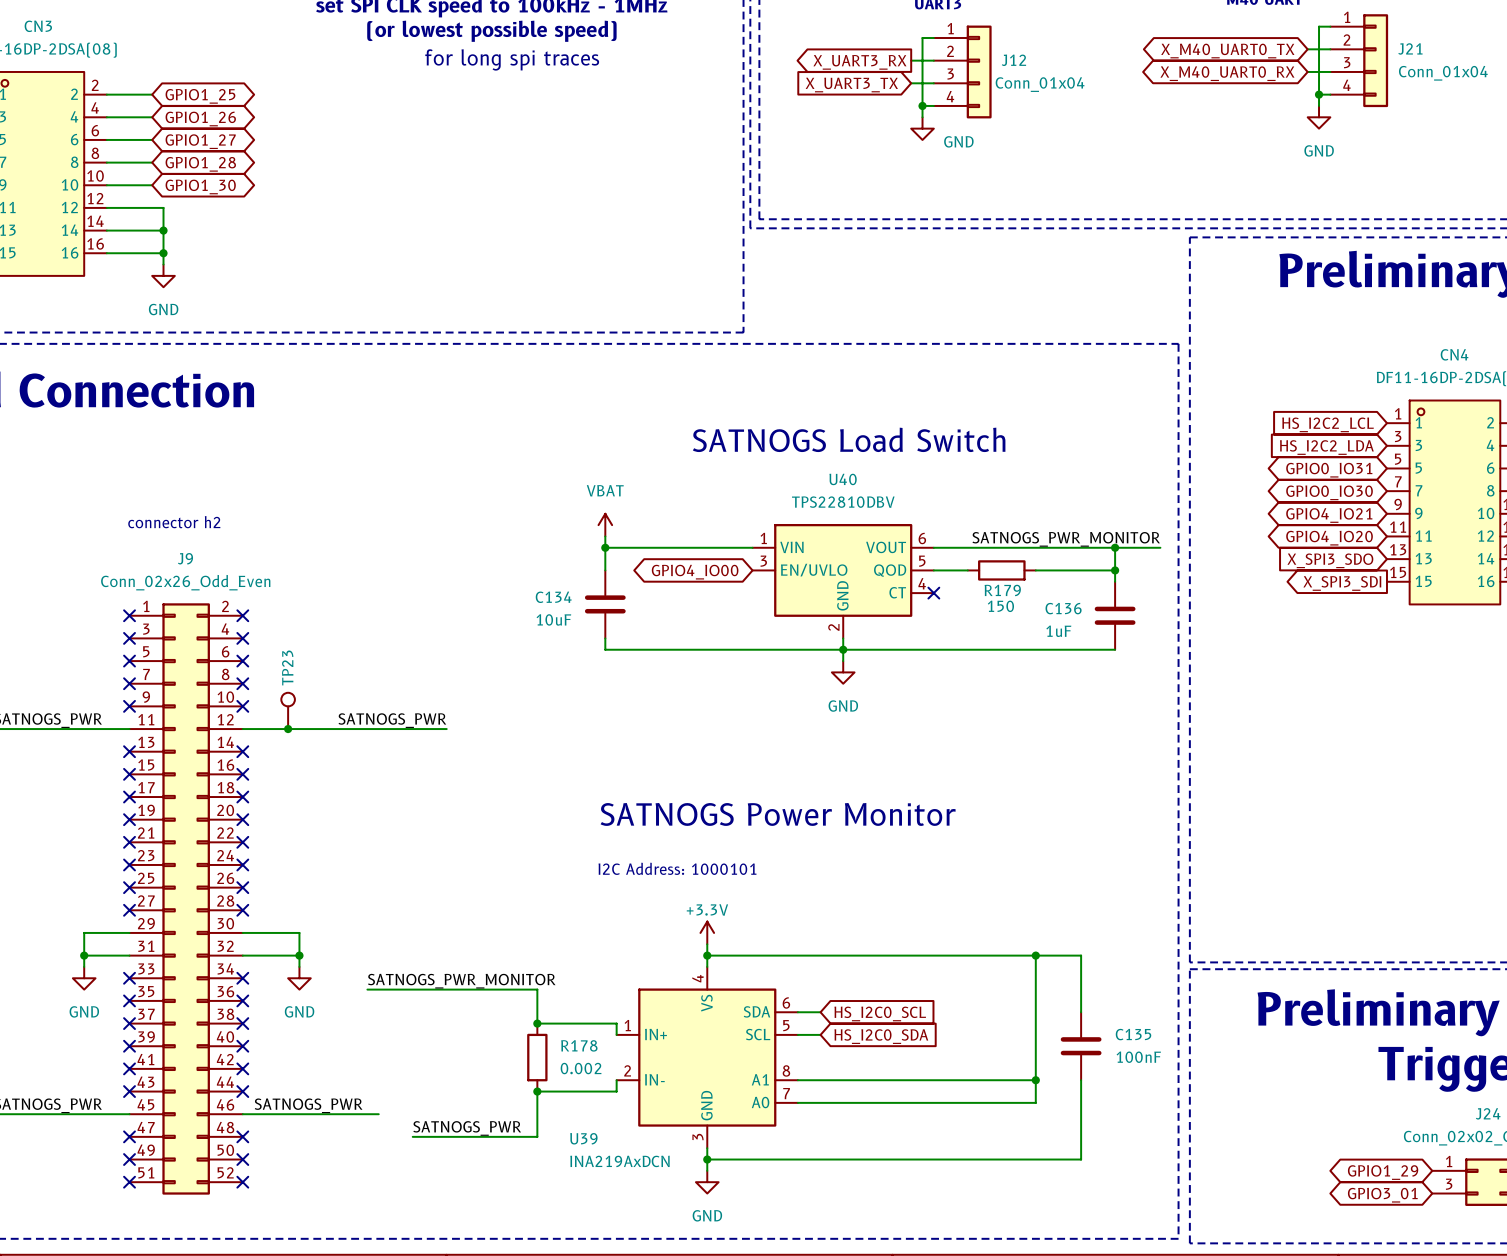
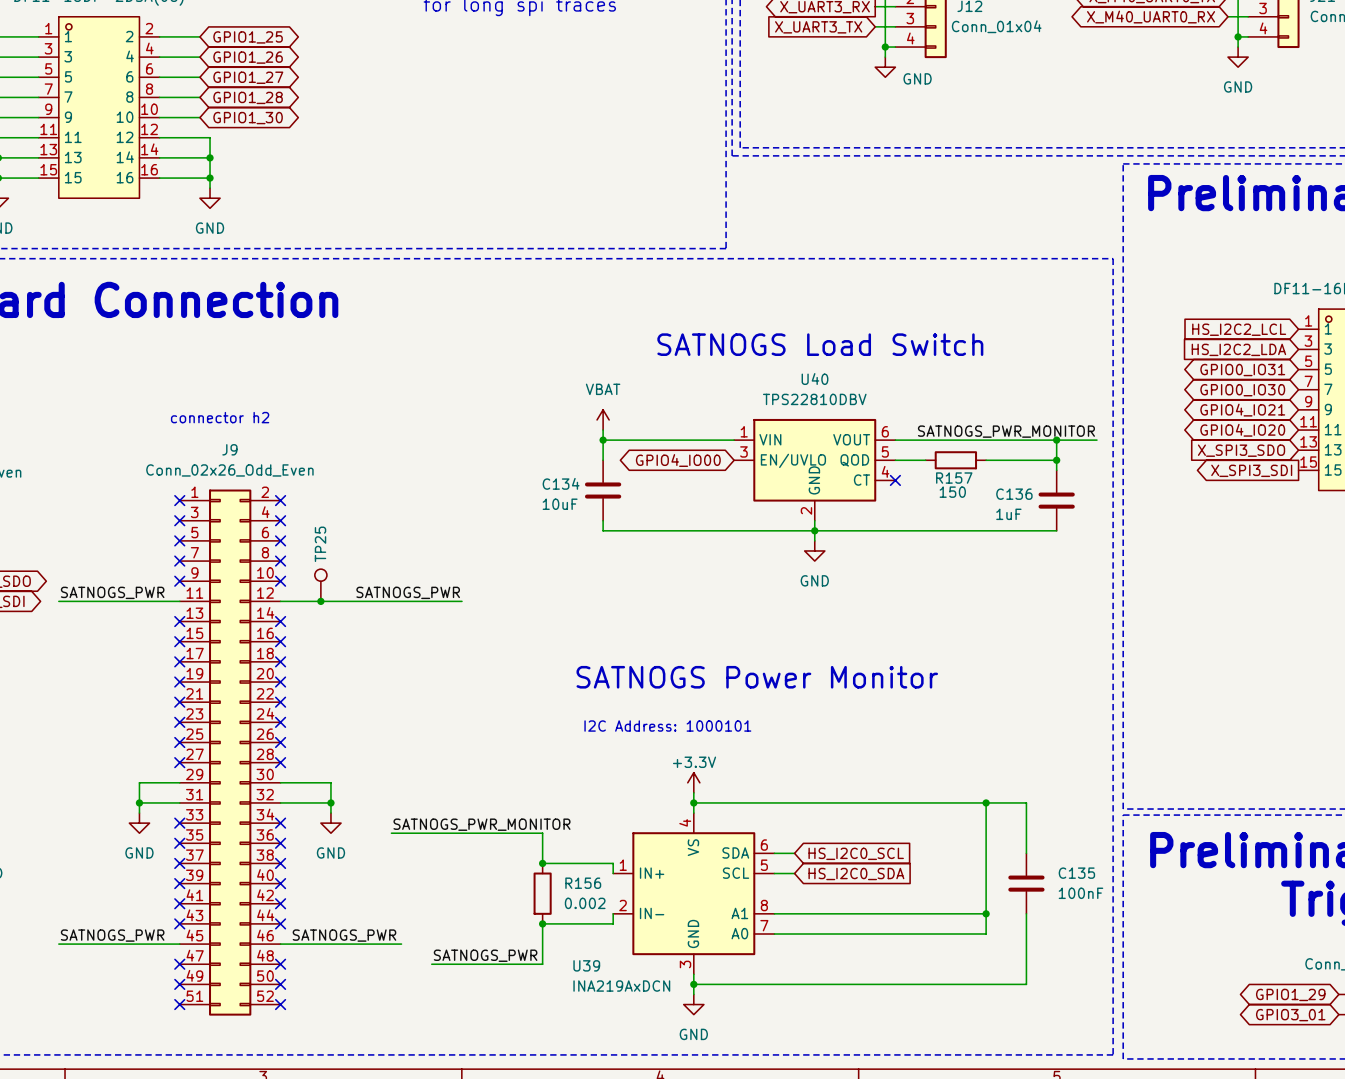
R179 name: R179 (1002, 590) -> R157 (954, 478)
TP23 name: TP23 (287, 667) -> TP25 (320, 544)
R178 name: R178 (579, 1045) -> R156 (583, 883)

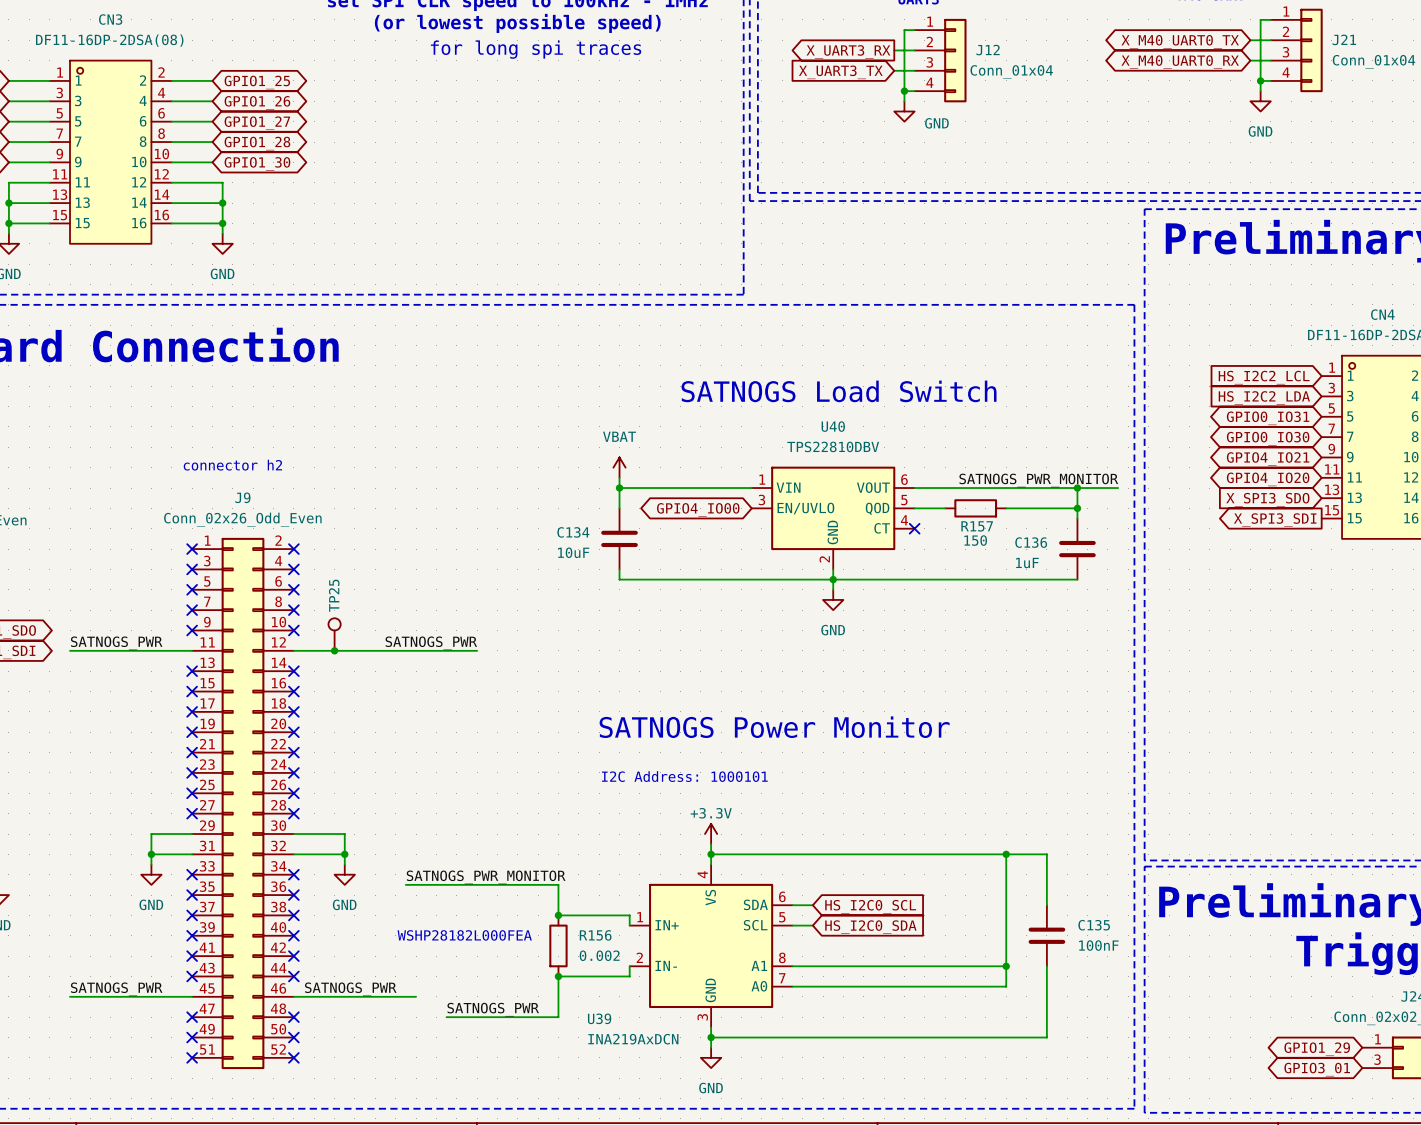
text: none -> WSHP28182L000FEA (464, 935)

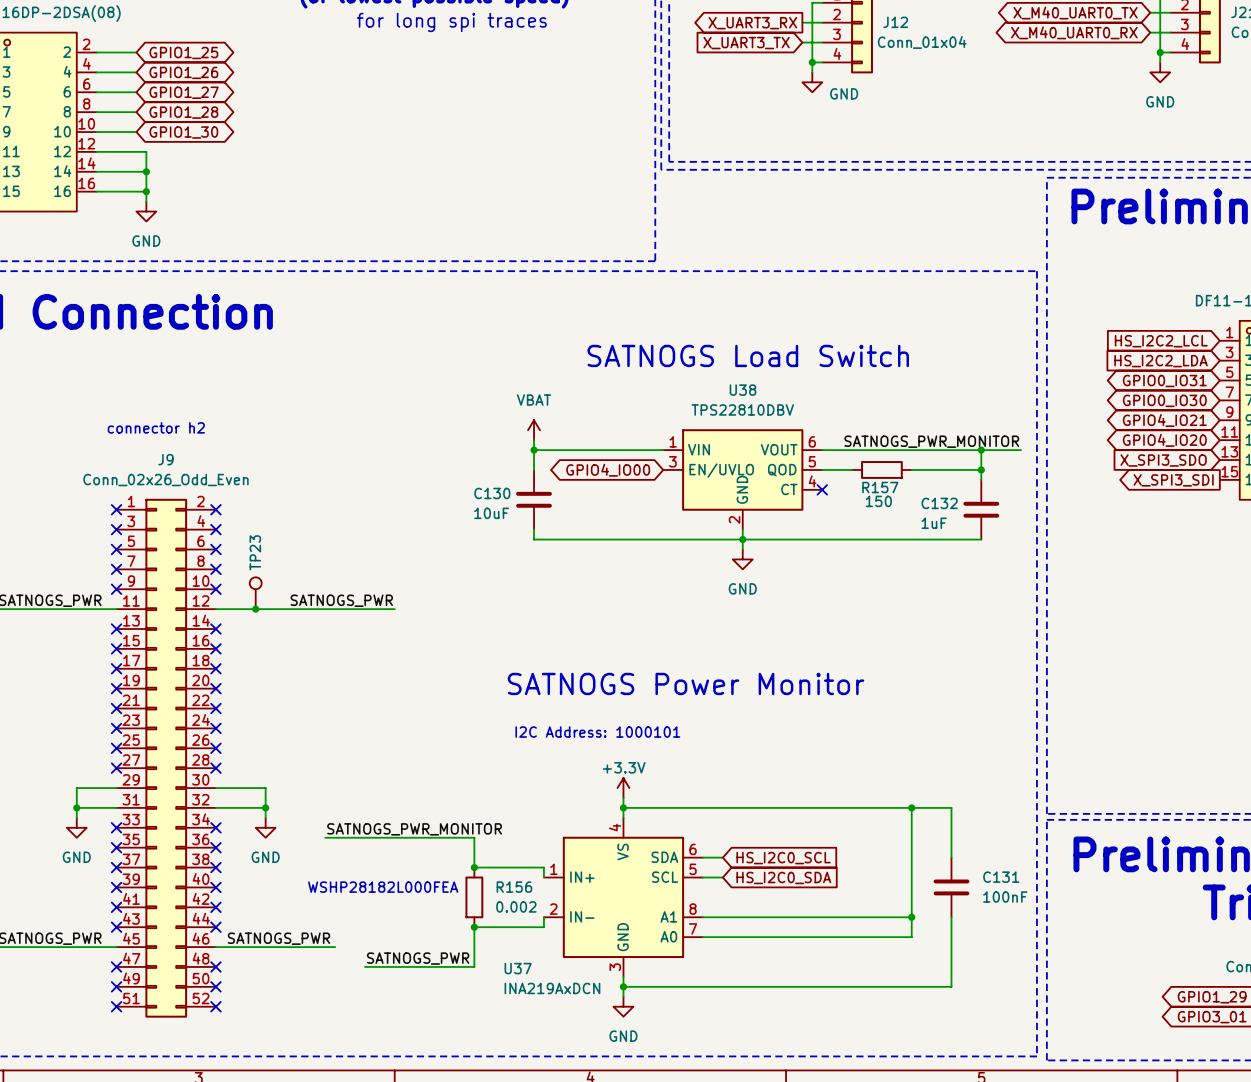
U40 name: U40 (833, 426) -> U38 (742, 390)
C134 name: C134 (573, 532) -> C130 (492, 493)
C136 name: C136 (1031, 542) -> C132 (939, 503)
TP25 name: TP25 (334, 595) -> TP23 (255, 552)
C135 name: C135 (1094, 925) -> C131 (1001, 877)
U39 name: U39 (599, 1018) -> U37 (518, 968)

